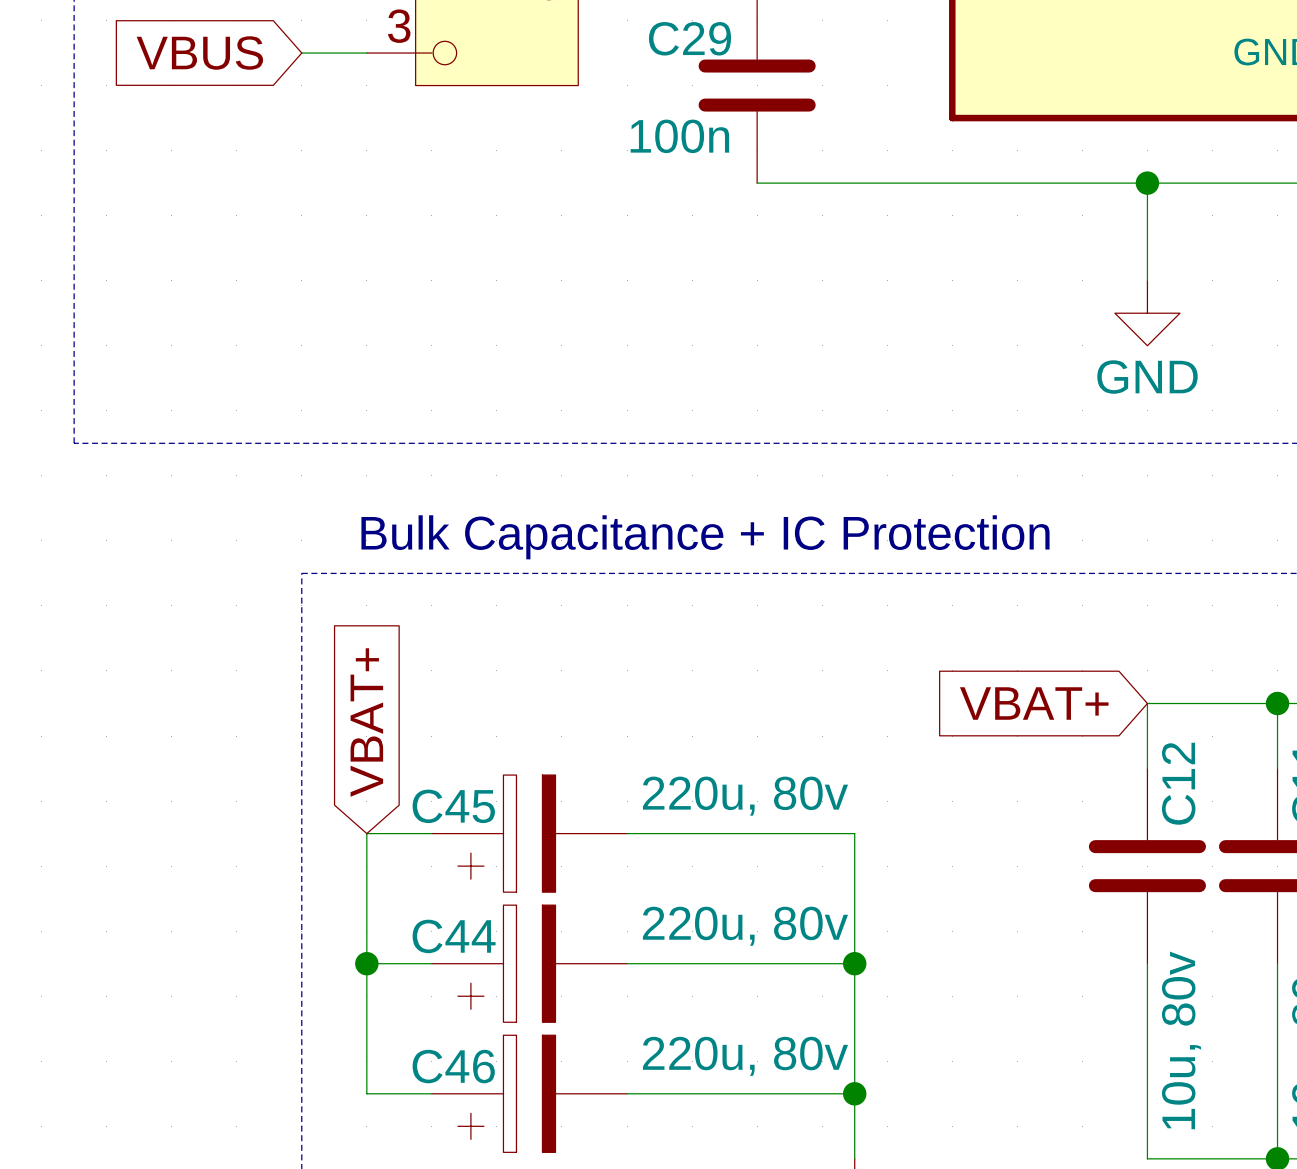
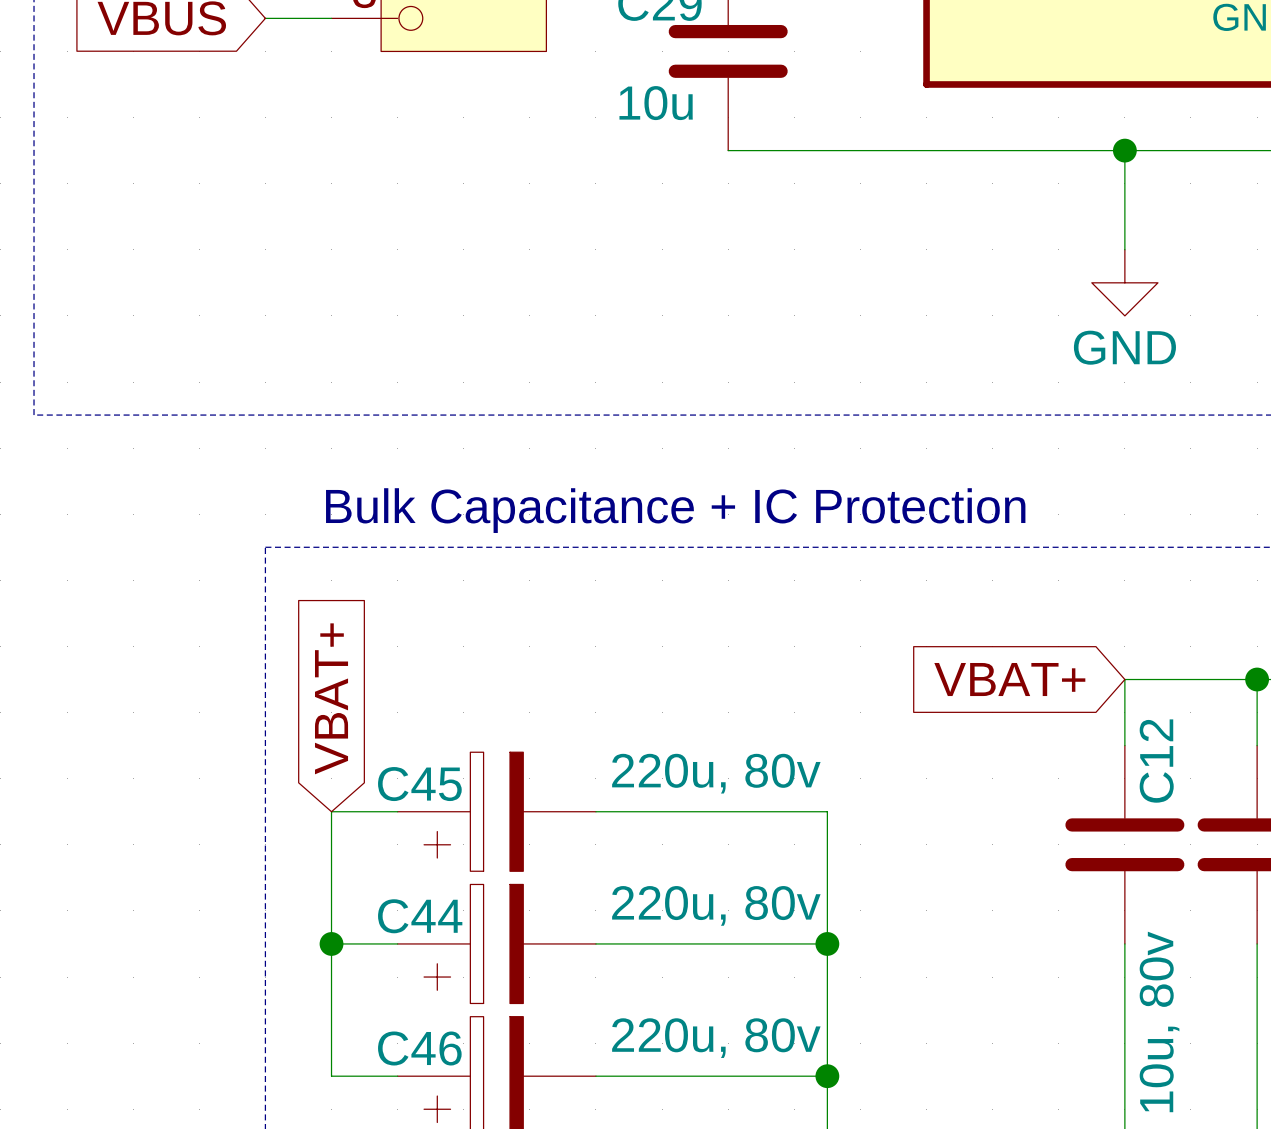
C29 value: 100n (679, 136) -> 10u (656, 103)

